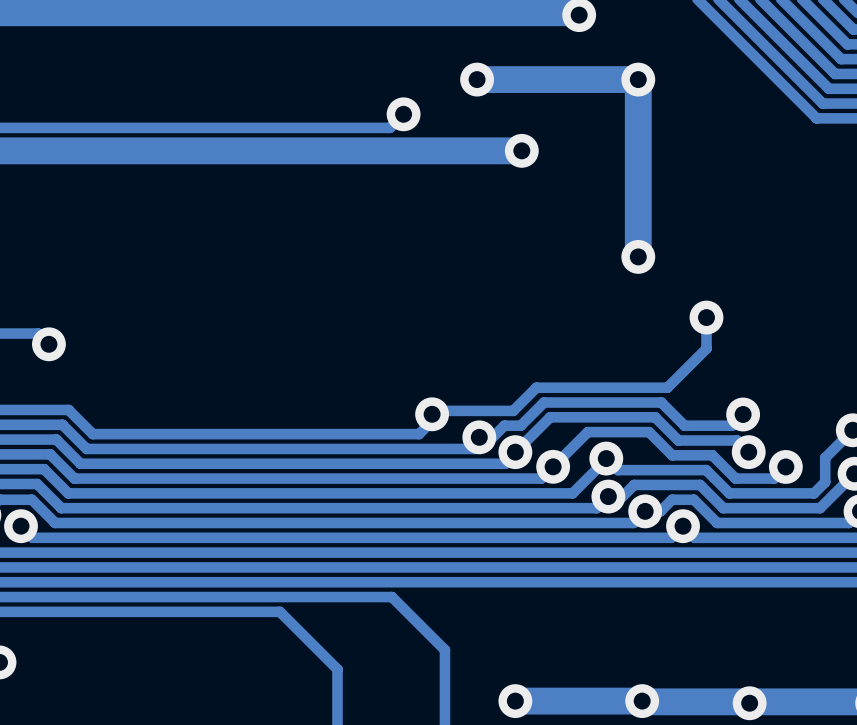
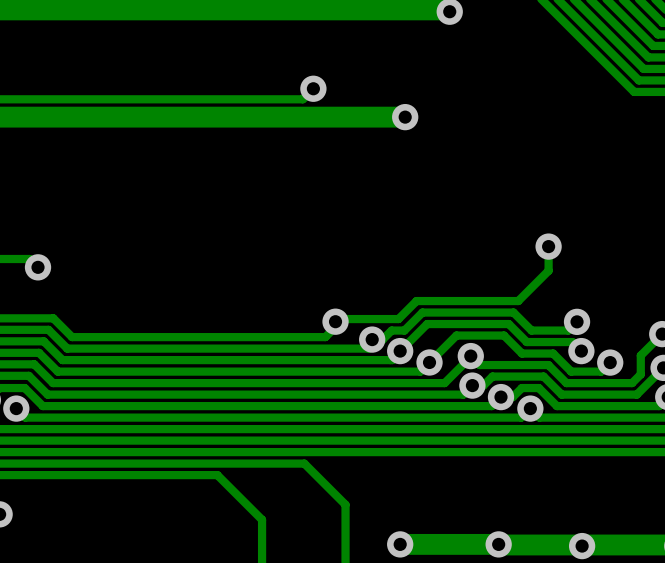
track: (477, 79) (638, 79) (638, 256) -> none
via: (477, 79) -> none
via: (638, 79) -> none
via: (638, 256) -> none

